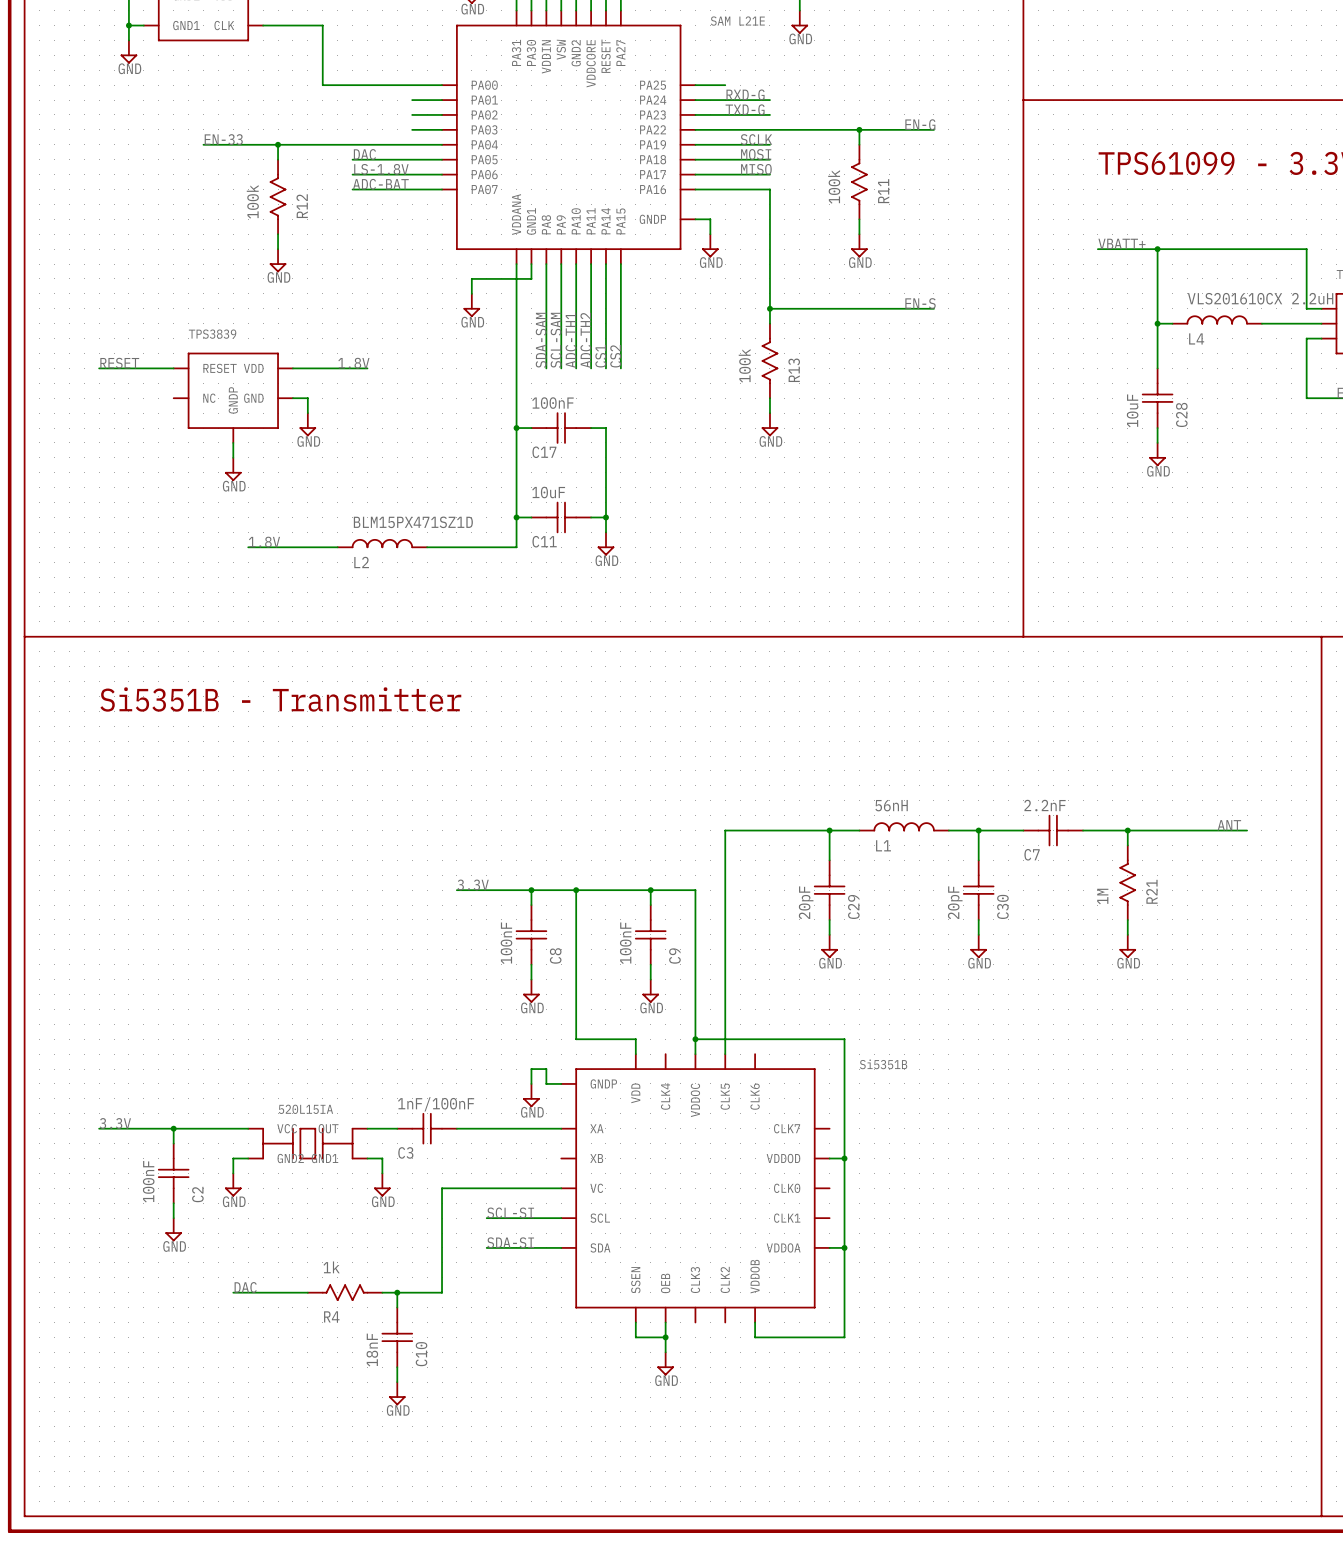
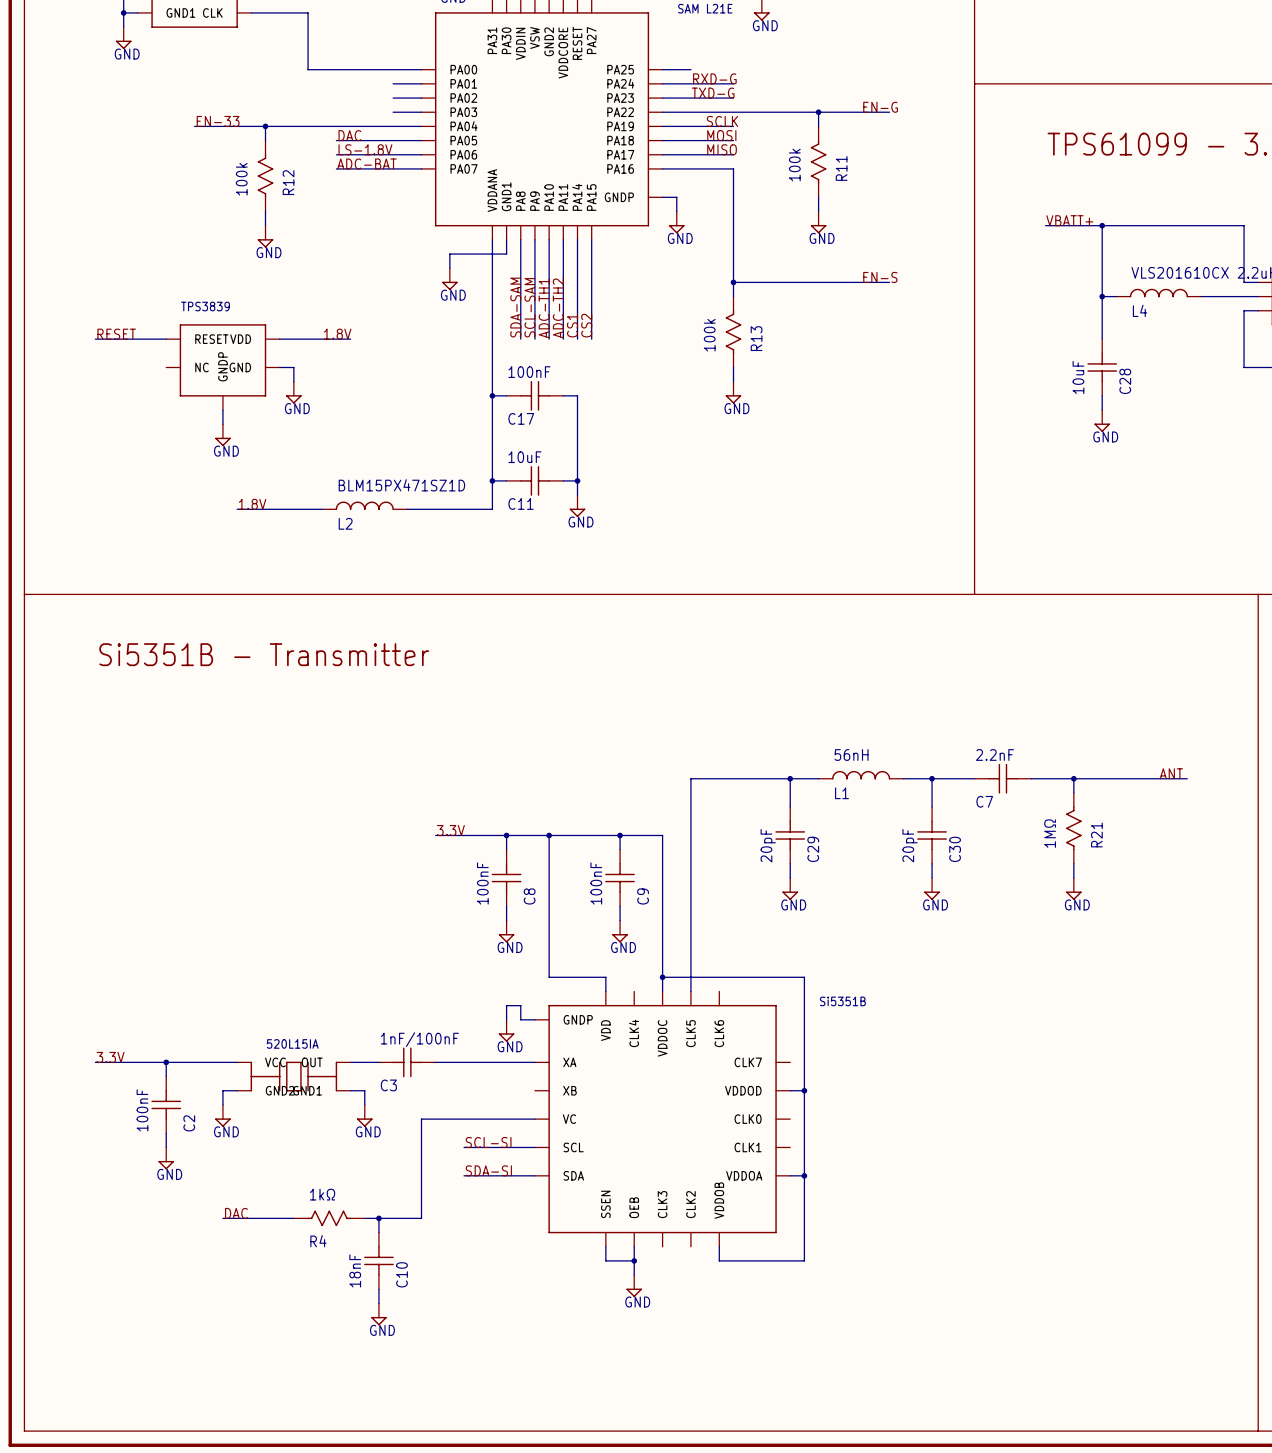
R21 value: 1M (1102, 896) -> 1MΩ (1050, 833)
R4 value: 1k (331, 1267) -> 1kΩ (322, 1194)

